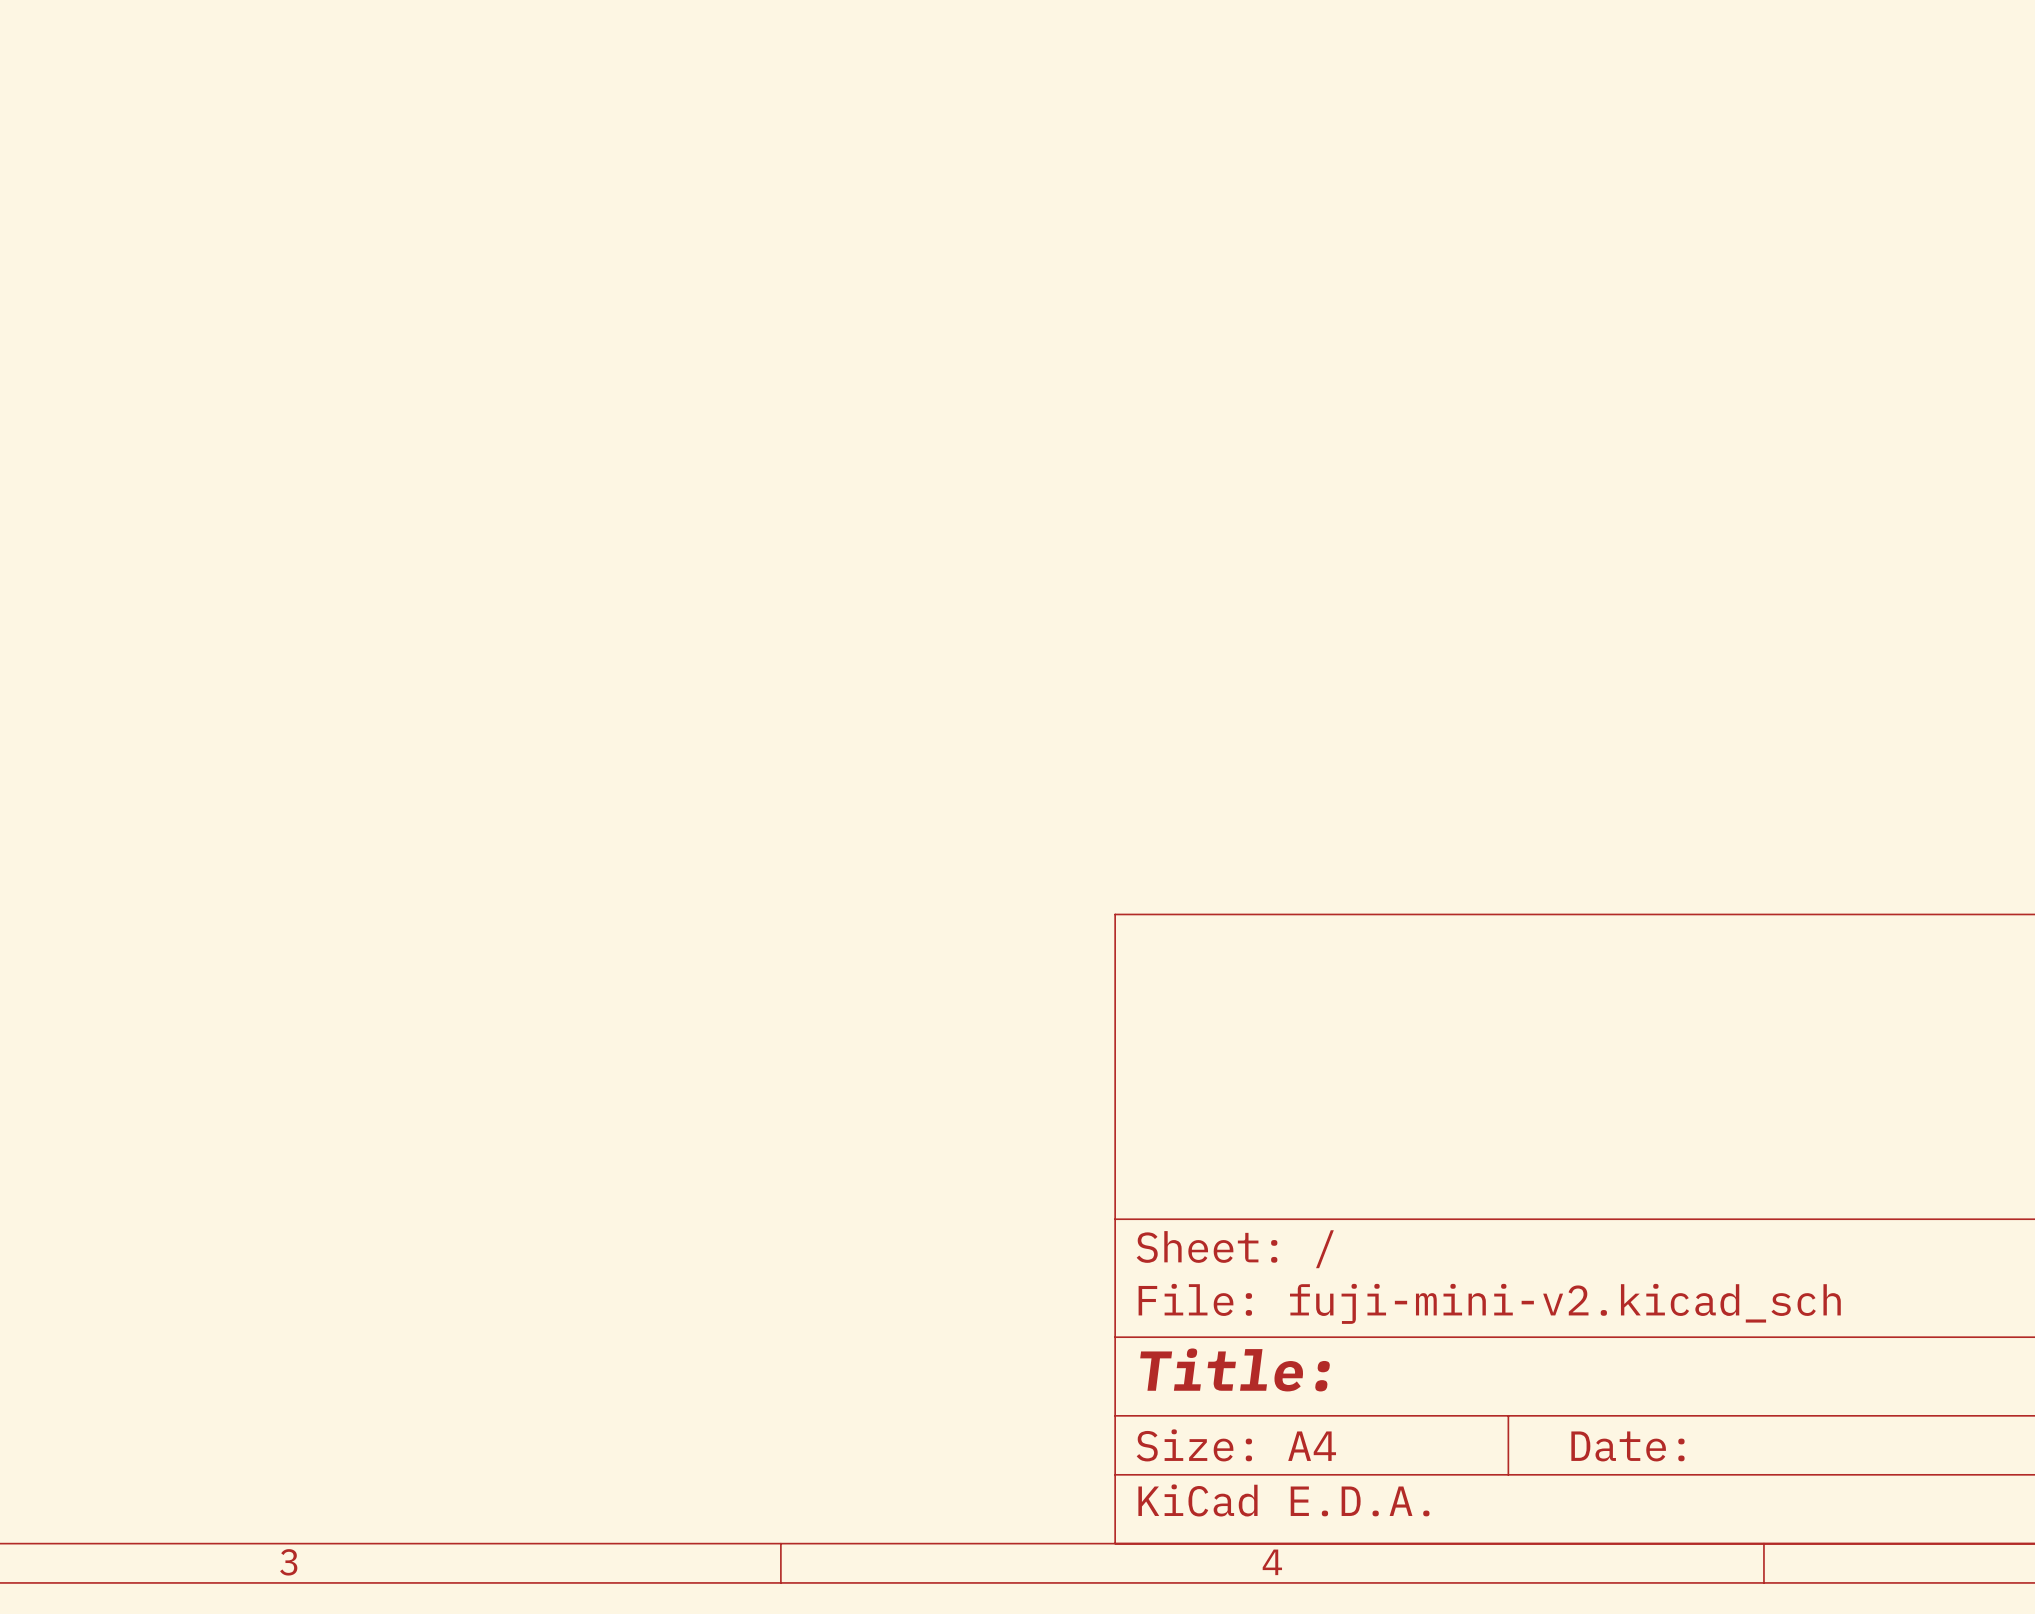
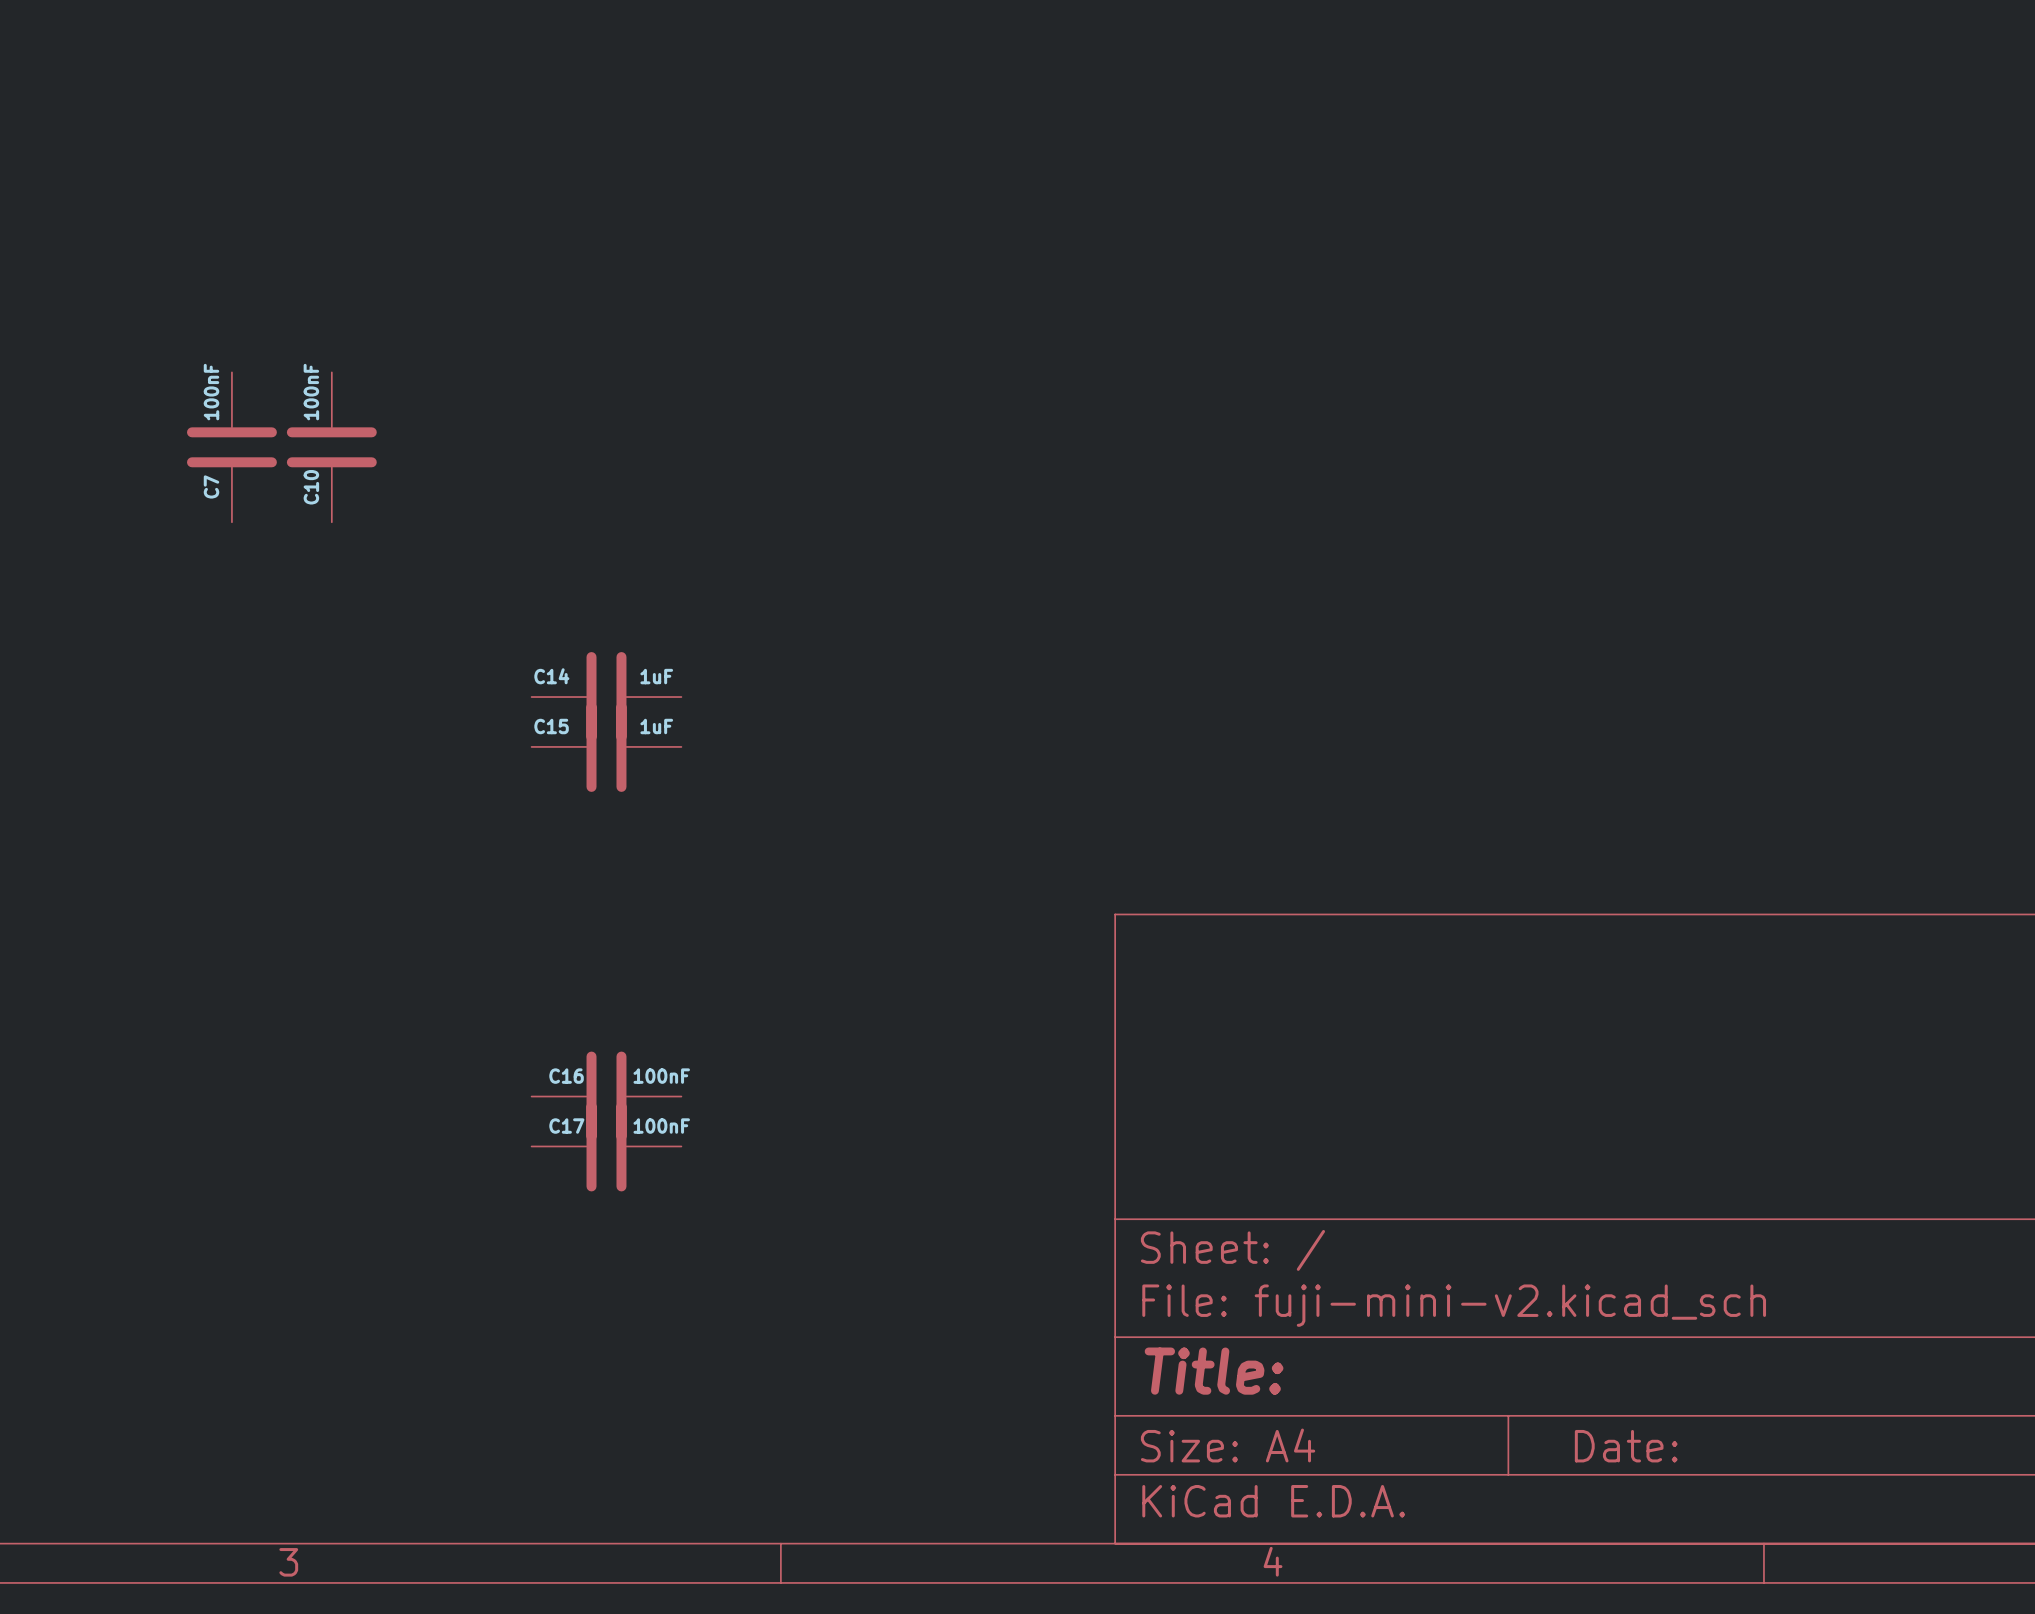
C7: none -> 100nF (231, 447)
C10: none -> 100nF (331, 447)
C14: none -> 1uF (606, 697)
C15: none -> 1uF (606, 746)
C16: none -> 100nF (606, 1096)
C17: none -> 100nF (606, 1146)

